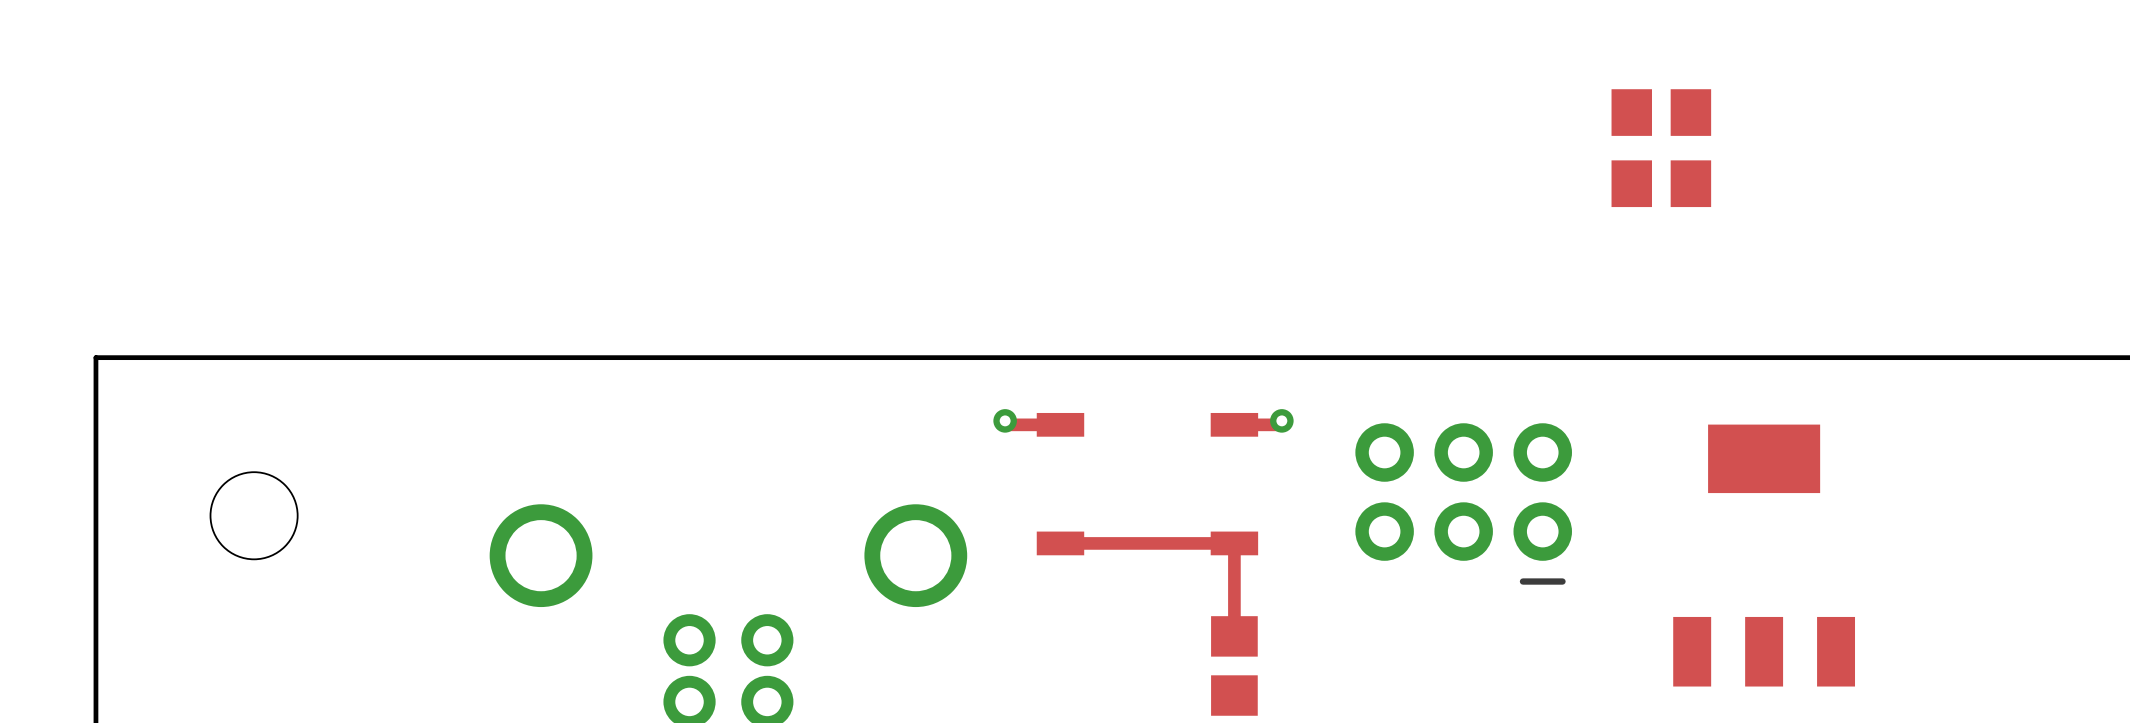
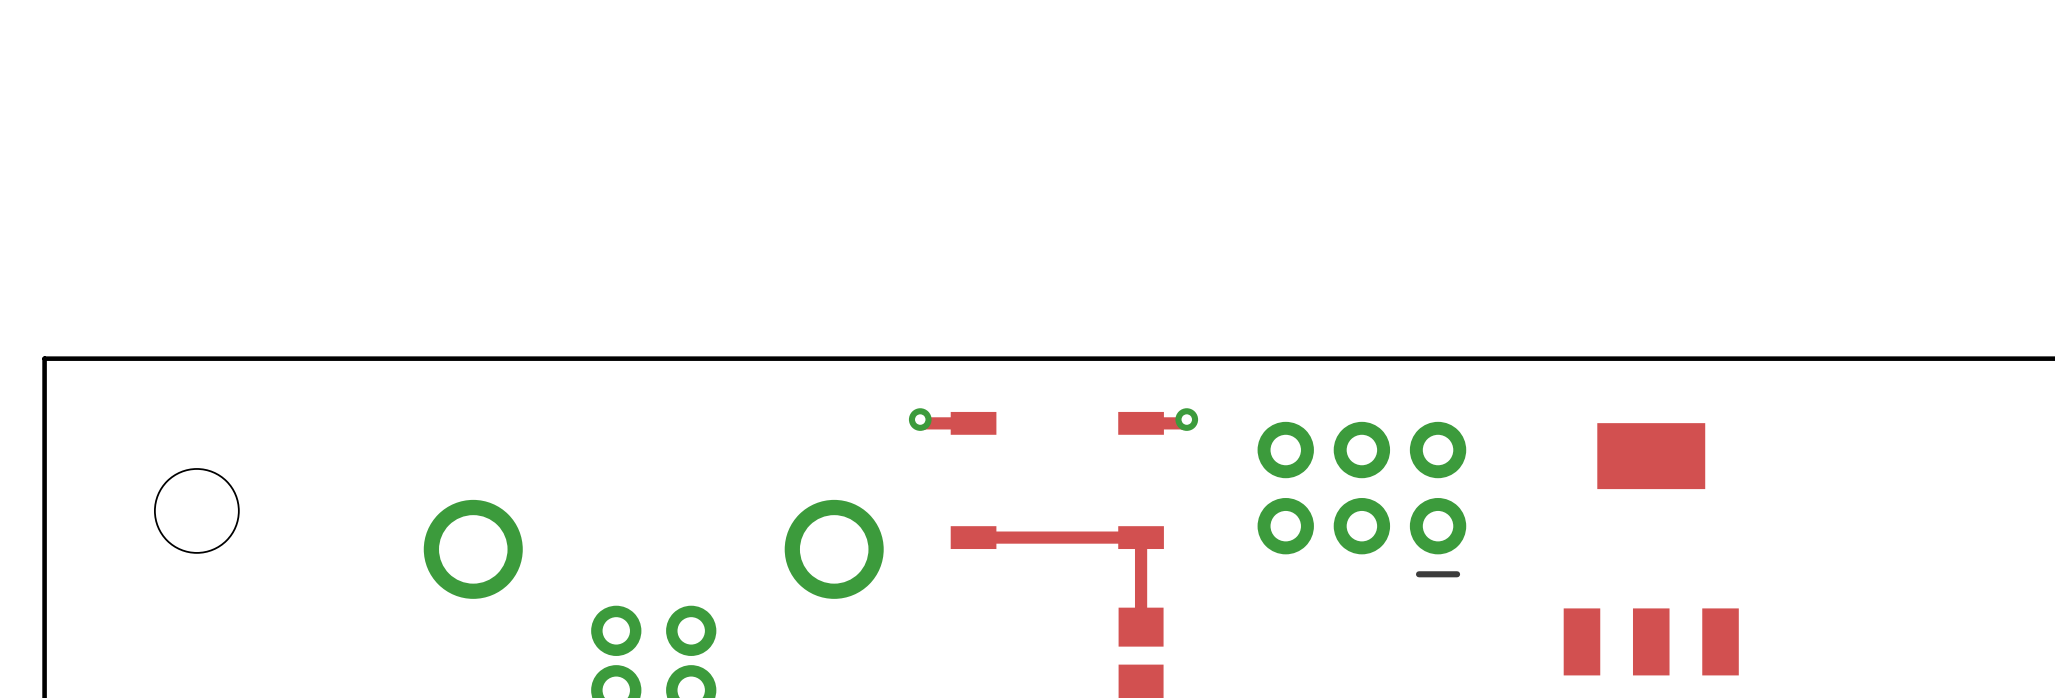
part: (1661, 112) -> none
part: (1661, 183) -> none

